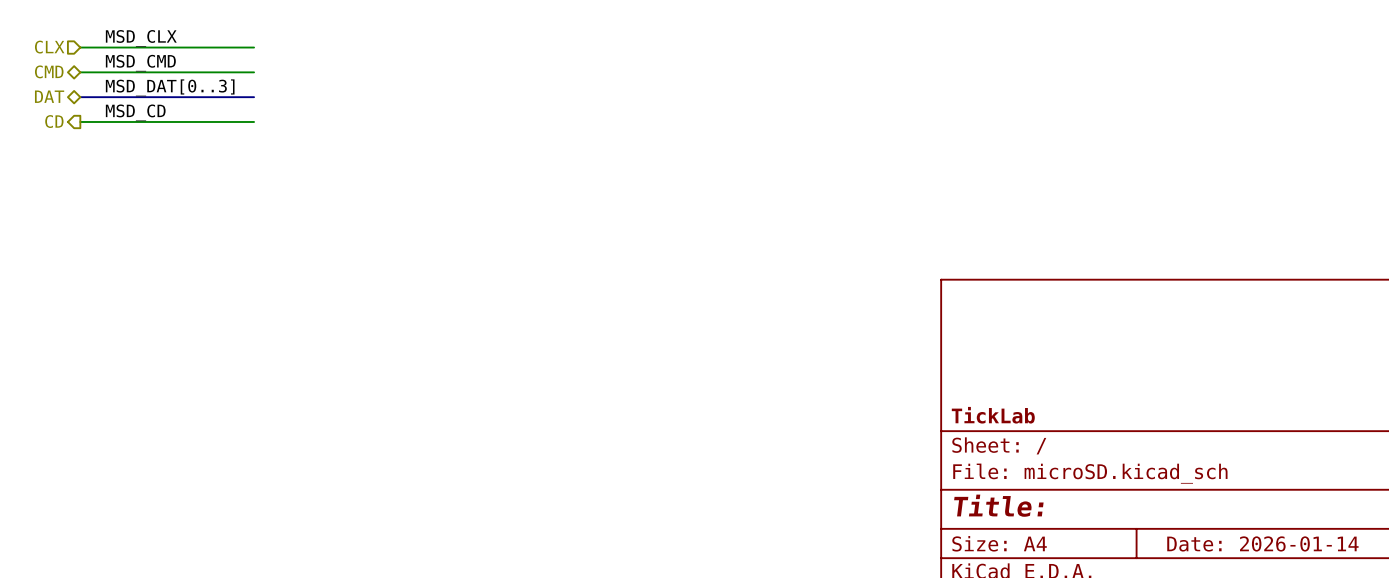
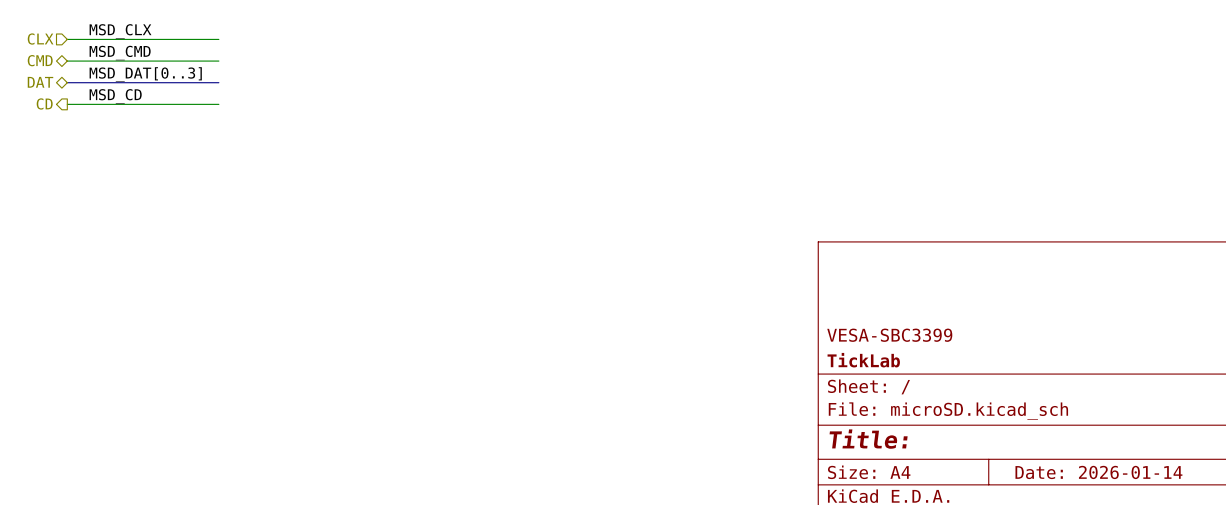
title block: none -> VESA-SBC3399 (889, 335)

